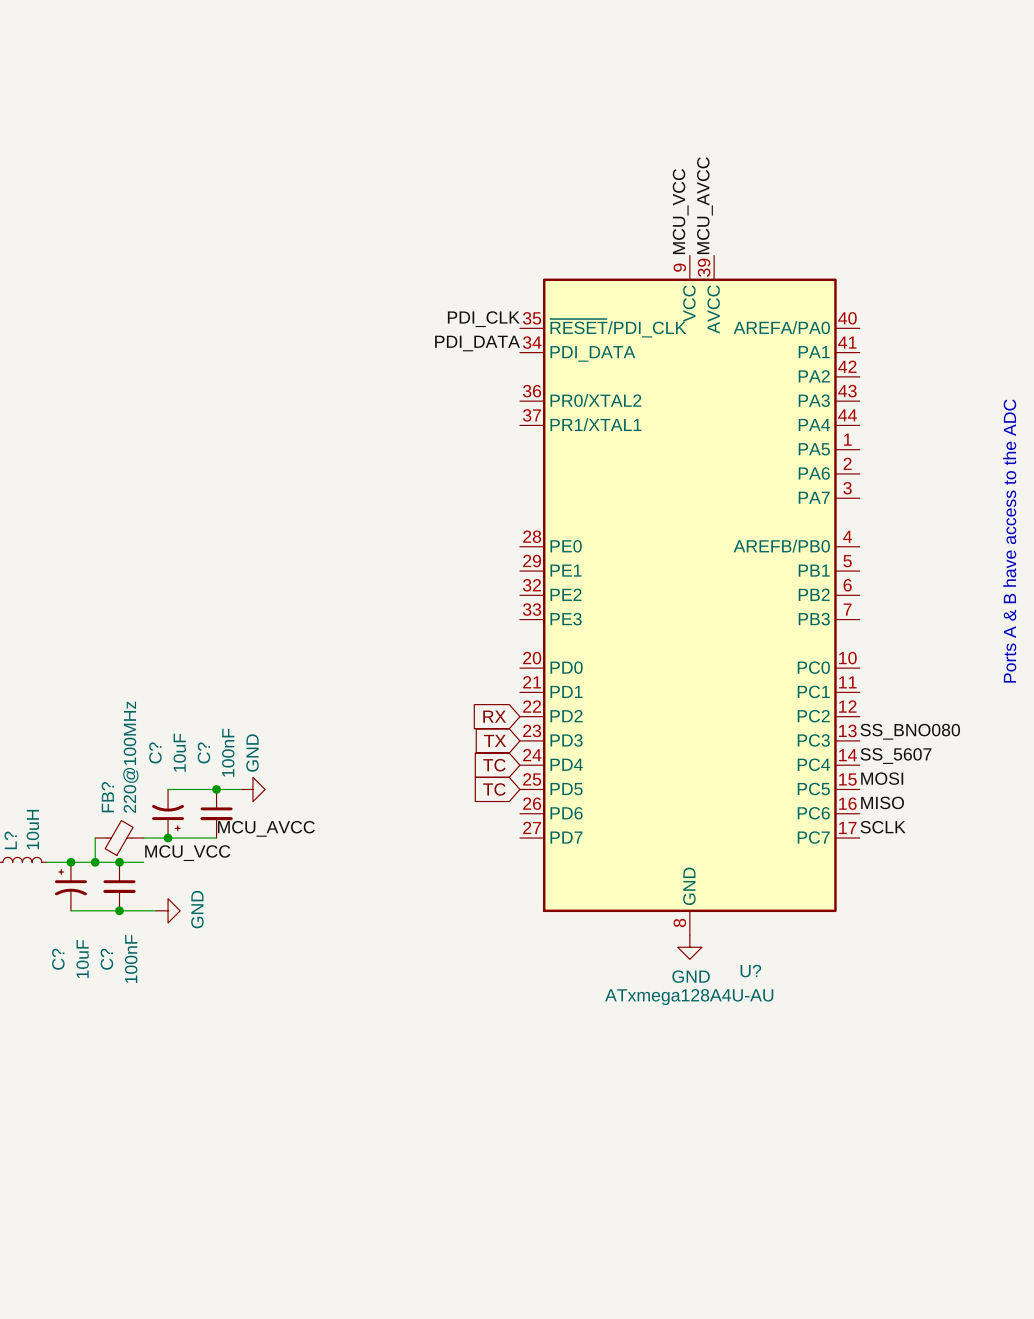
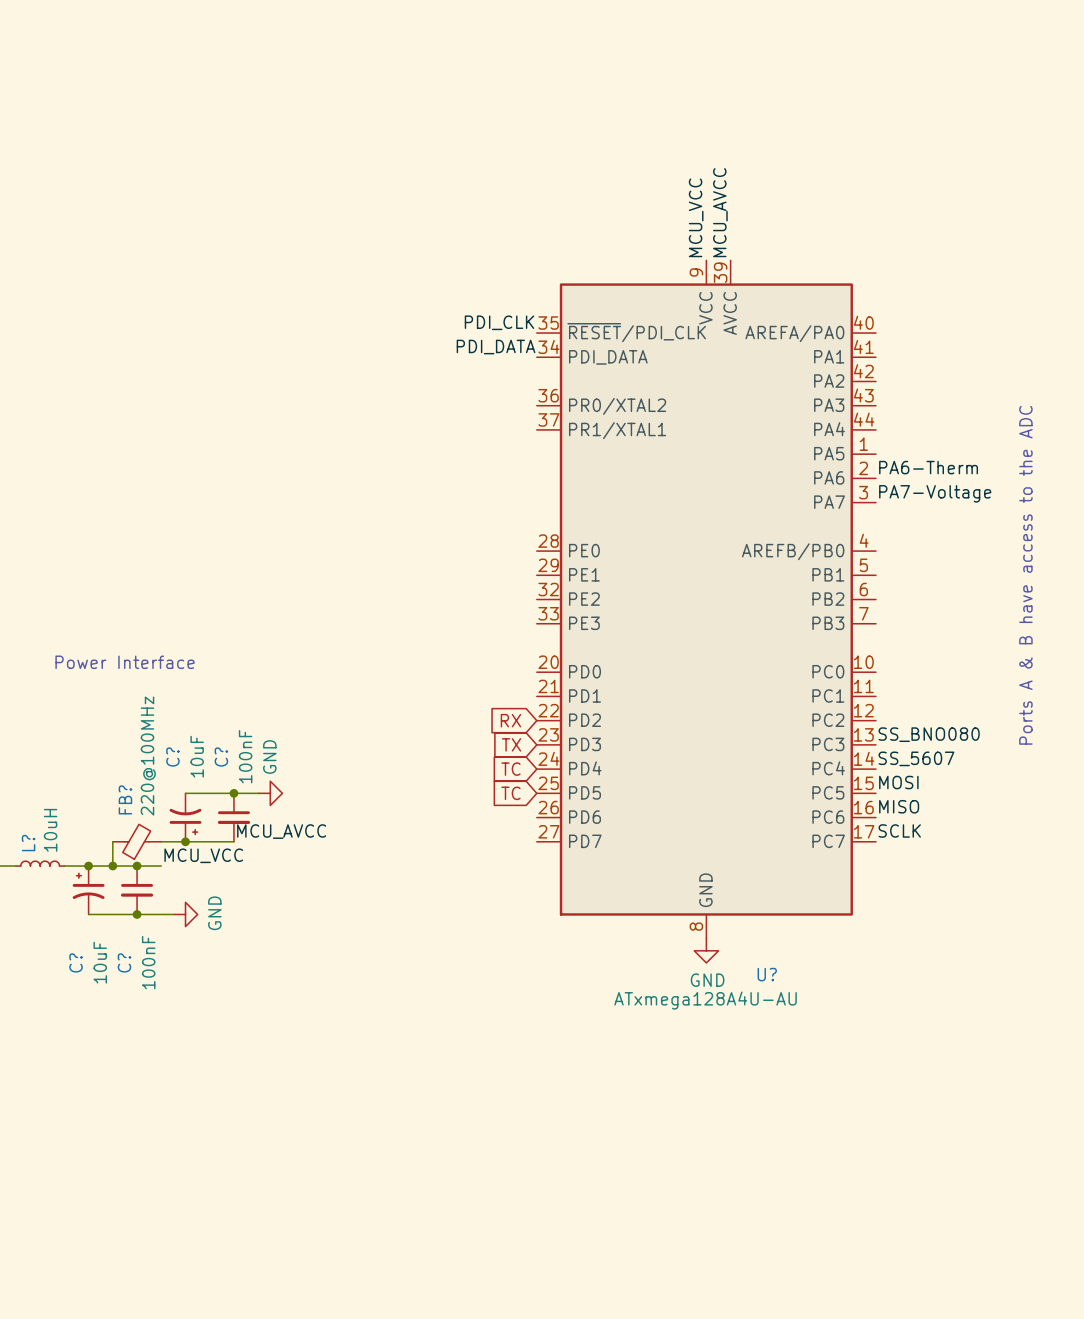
label: none -> PA6-Therm (928, 467)
label: none -> PA7-Voltage (935, 493)
text: none -> Power Interface (125, 662)

